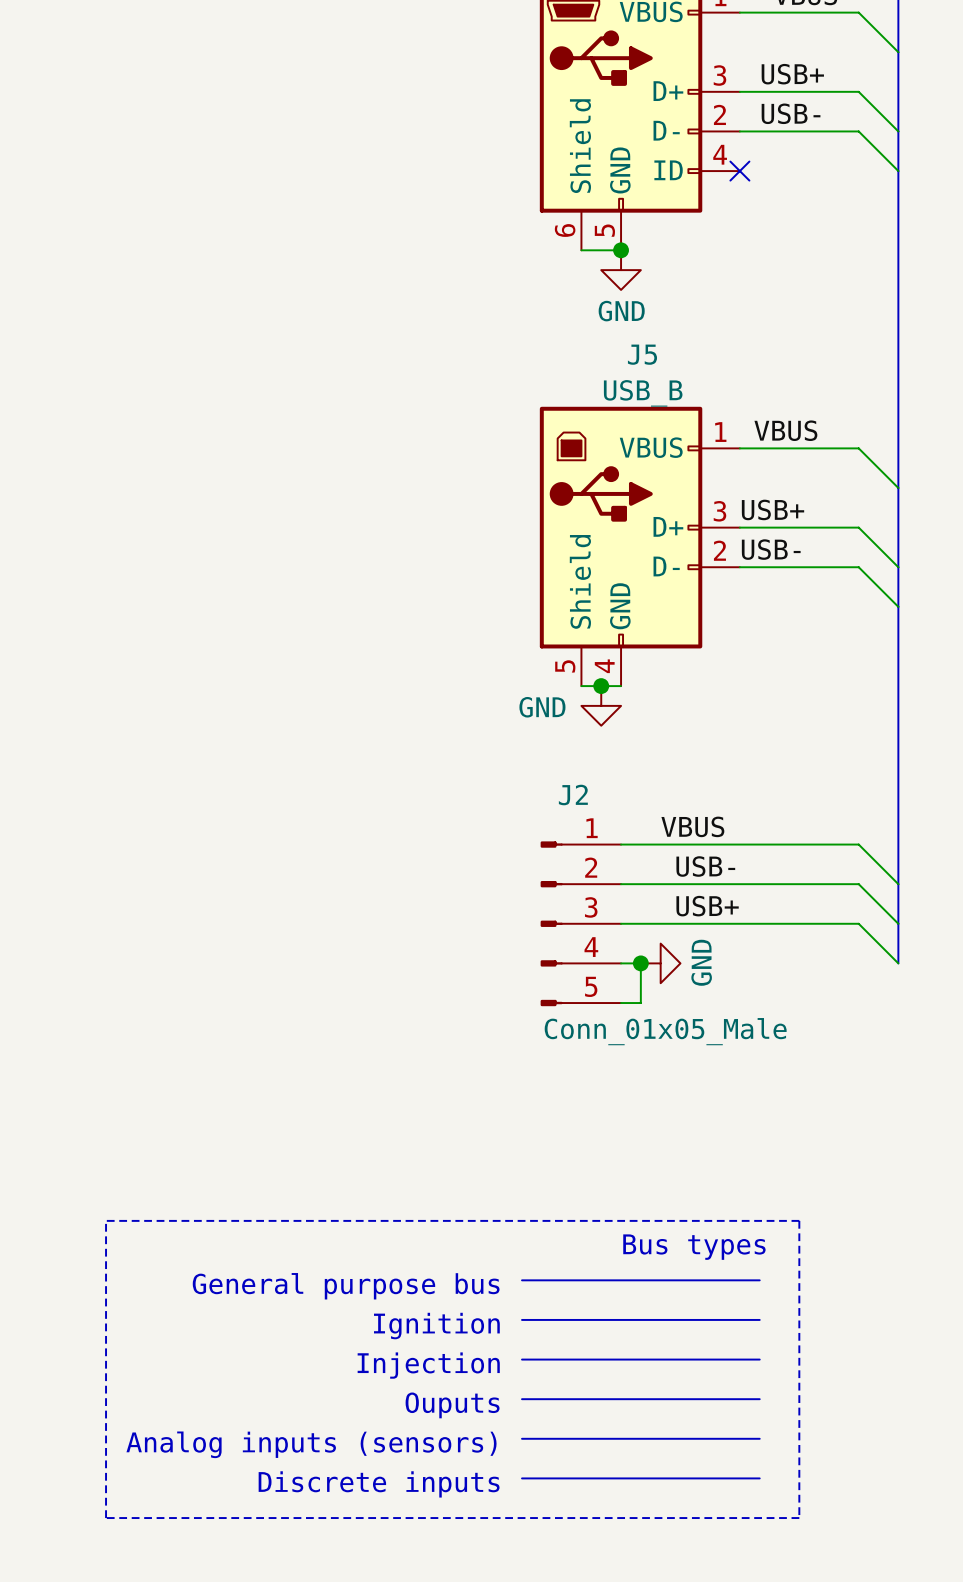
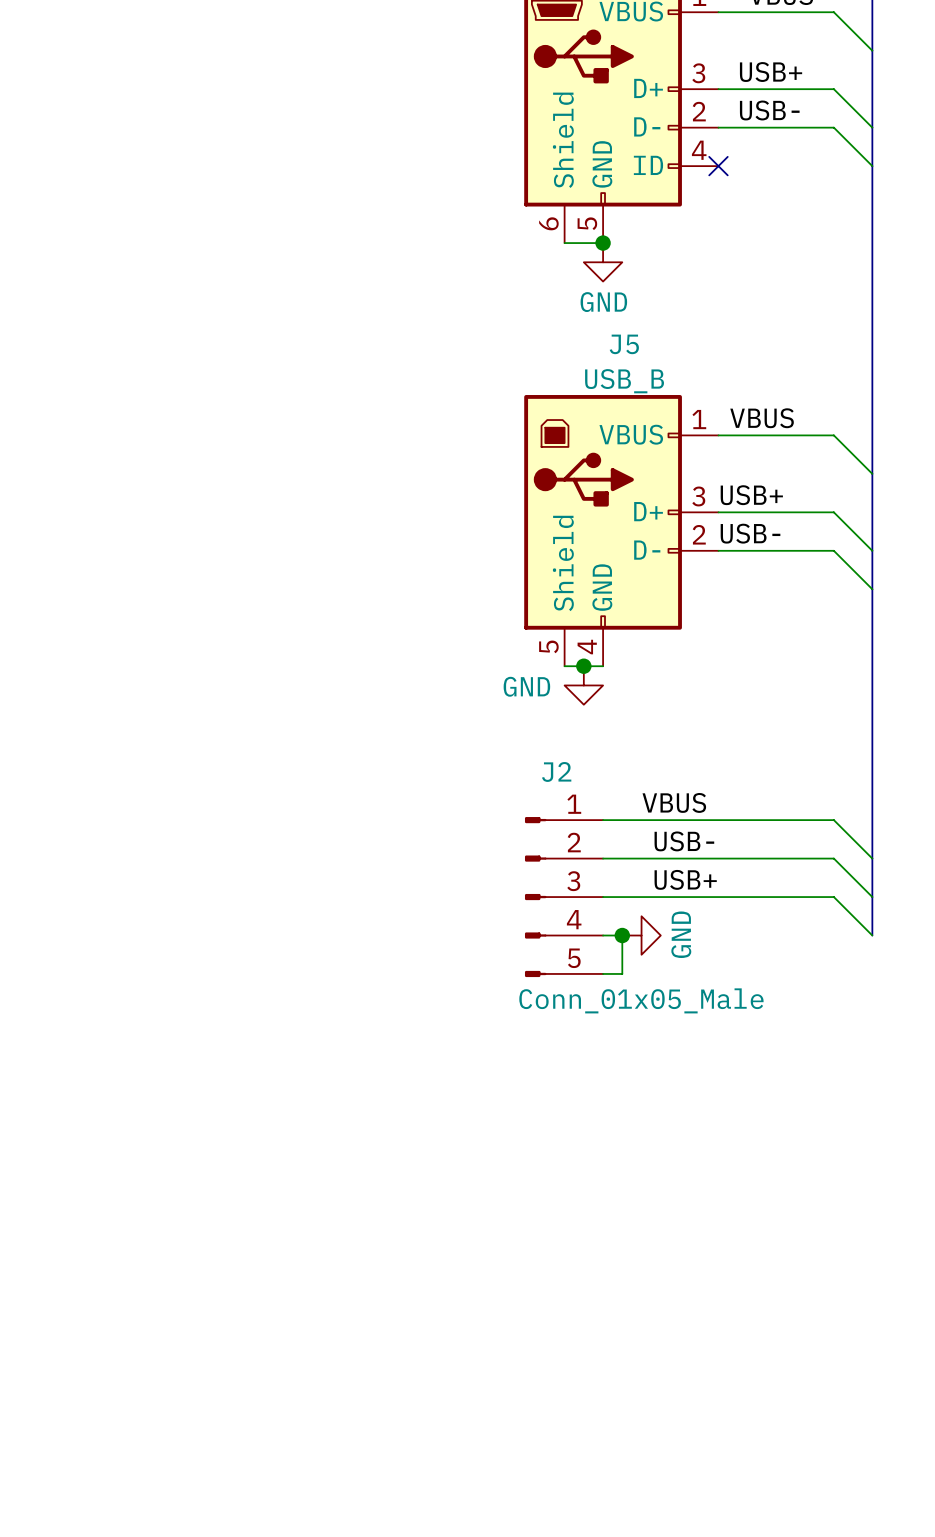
line: (106, 1220) (106, 1518) (799, 1518) (799, 1220) (106, 1220) -> none
text: Bus types (694, 1247) -> none
bus: (522, 1280) (759, 1280) -> none
text: General purpose bus (346, 1286) -> none
bus: (522, 1319) (759, 1319) -> none
text: Ignition (436, 1326) -> none
bus: (522, 1359) (759, 1359) -> none
text: Injection (428, 1365) -> none
bus: (522, 1399) (759, 1399) -> none
text: Ouputs (452, 1405) -> none
bus: (522, 1438) (759, 1438) -> none
text: Analog inputs (sensors) (311, 1444) -> none
bus: (522, 1478) (759, 1478) -> none
text: Discrete inputs (379, 1484) -> none

